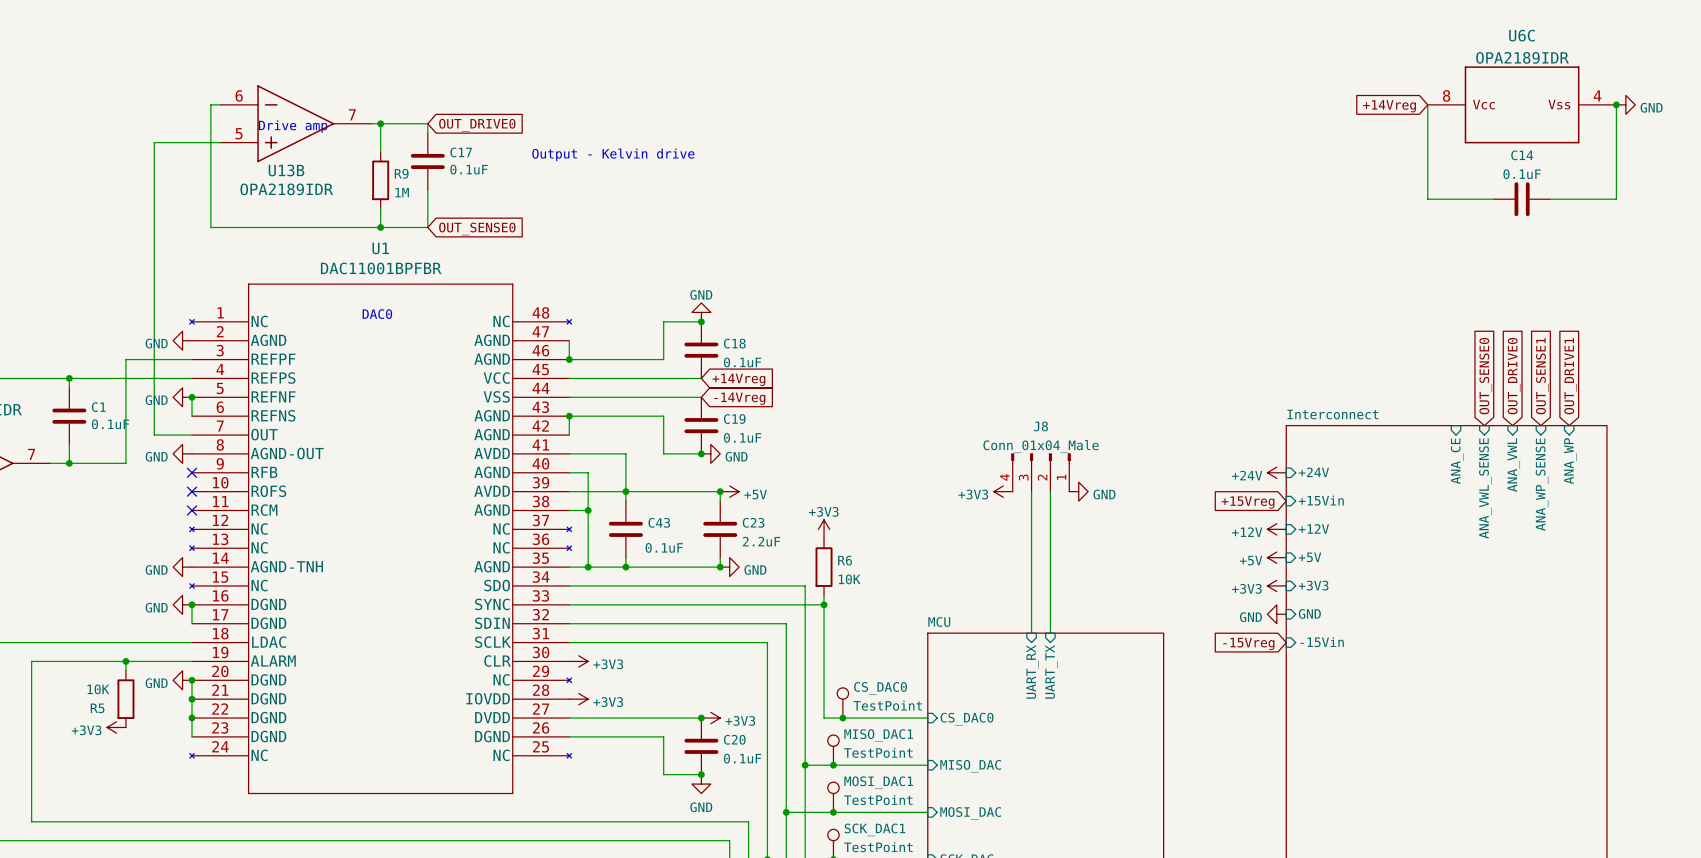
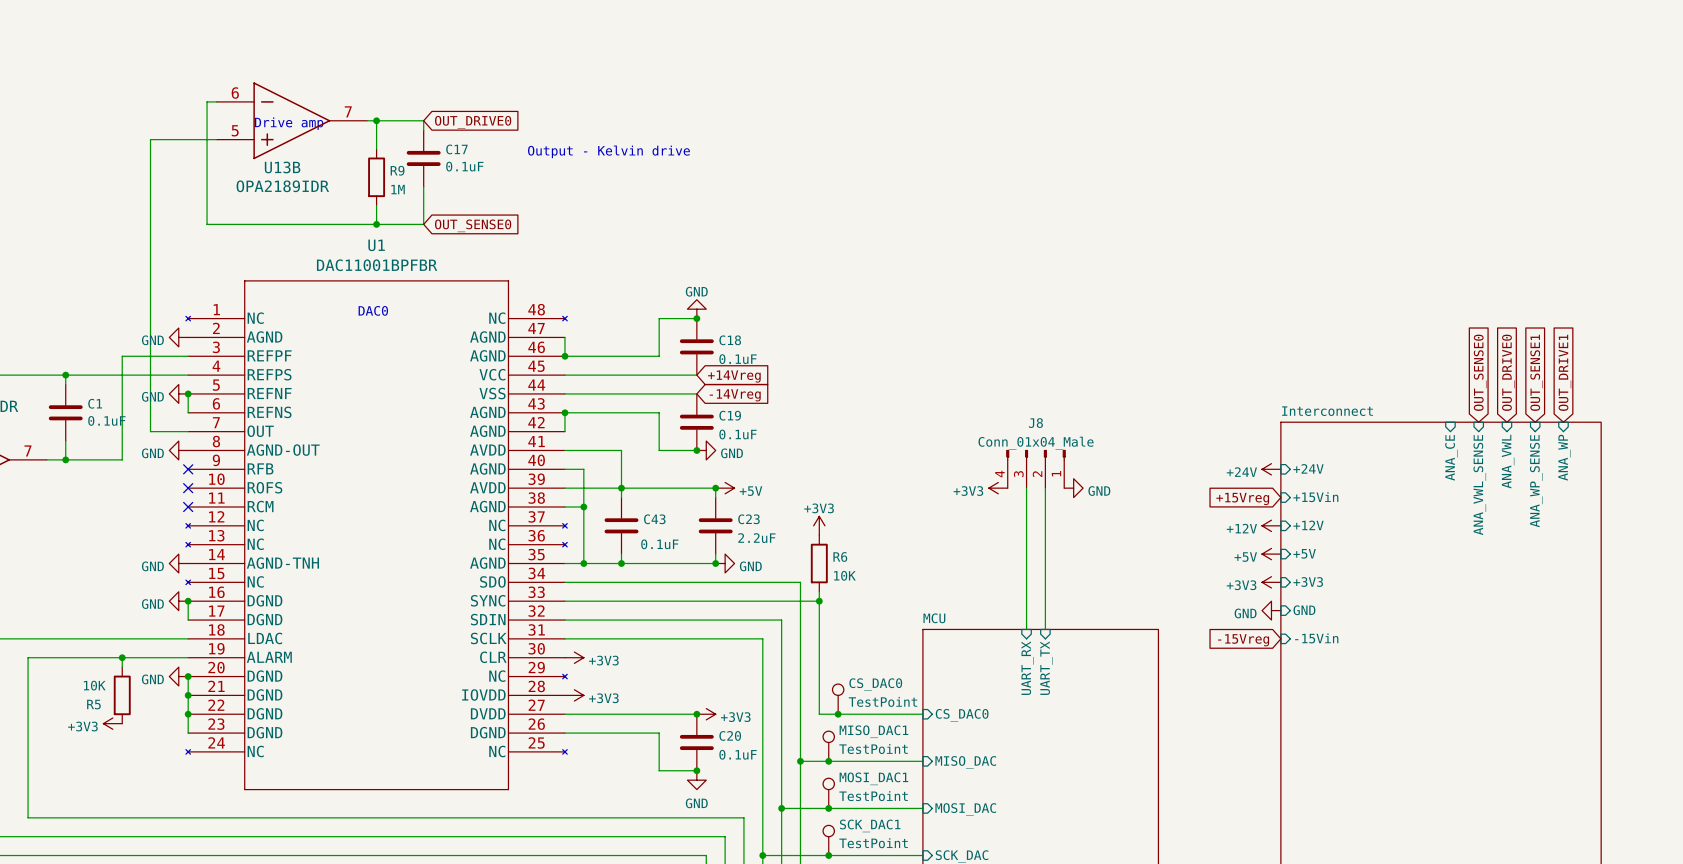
wire: (1427, 104) (1427, 199) (1493, 199) -> none
U6C: OPA2189IDR (1522, 104) -> none
wire: (1616, 104) (1616, 199) (1550, 199) -> none
junction: (1616, 104) -> none
power symbol: GND (1625, 104) -> none
global label: +14Vreg (1389, 106) -> none
C14: 0.1uF (1522, 199) -> none

